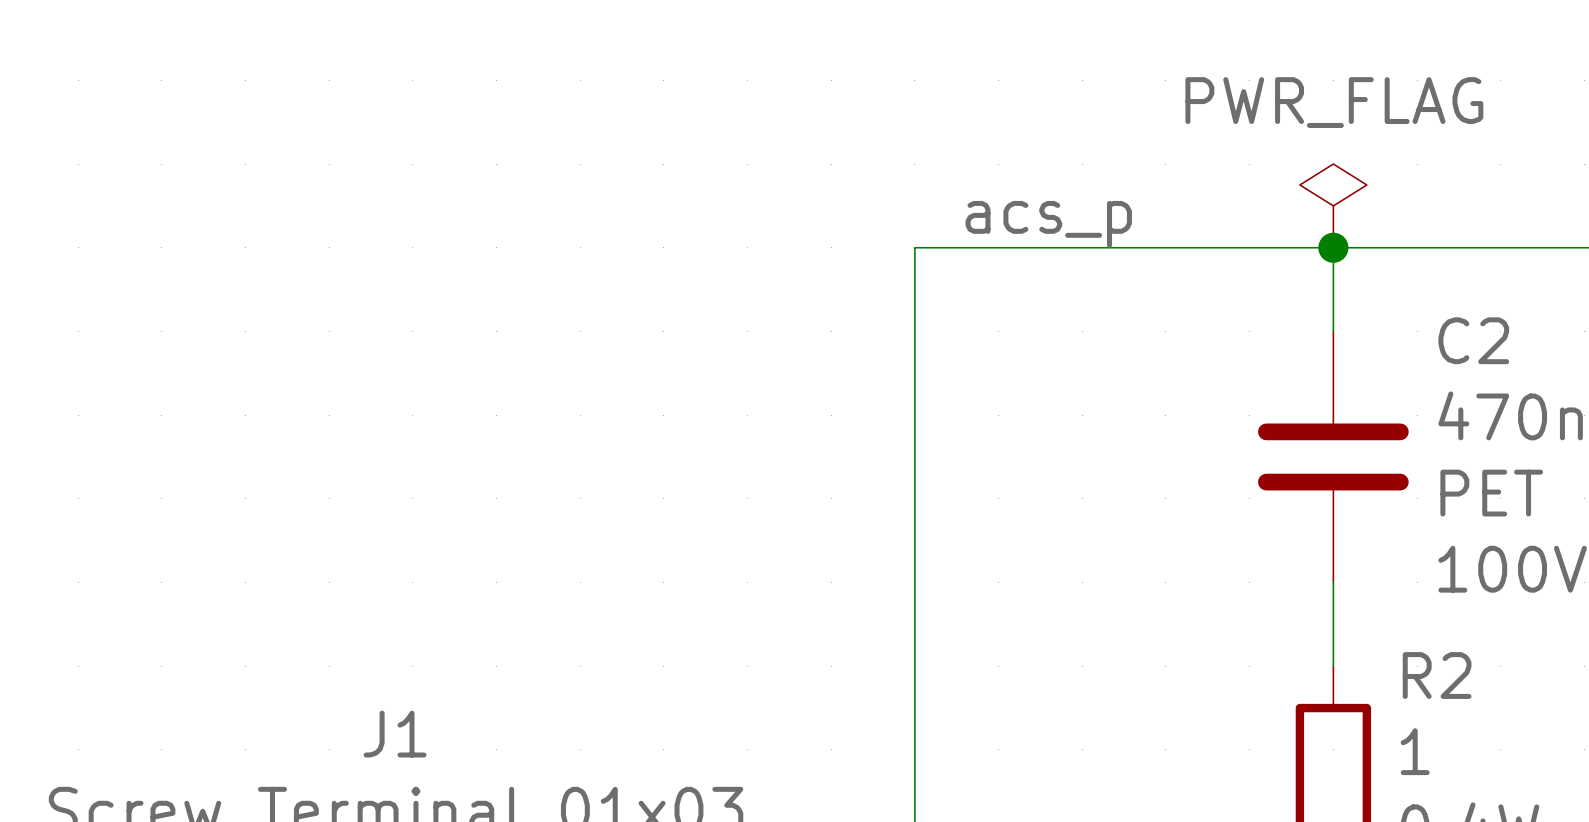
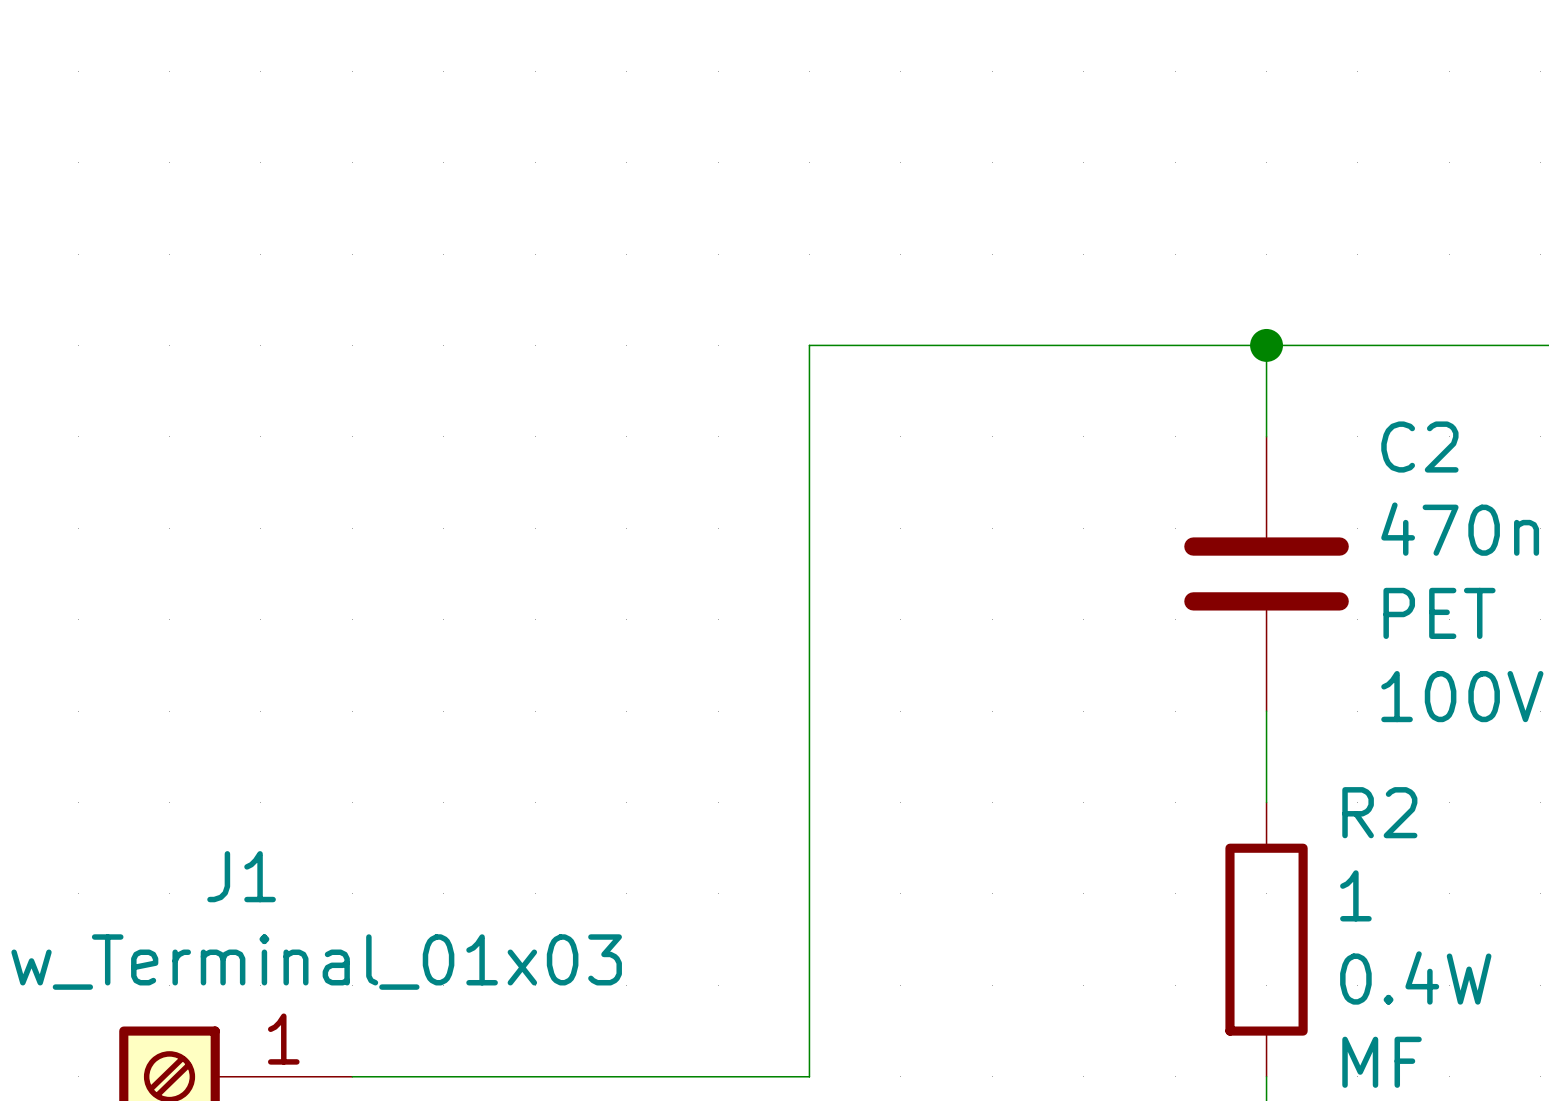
power symbol: PWR_FLAG (1333, 205) -> none
label: acs_p (1048, 224) -> none

